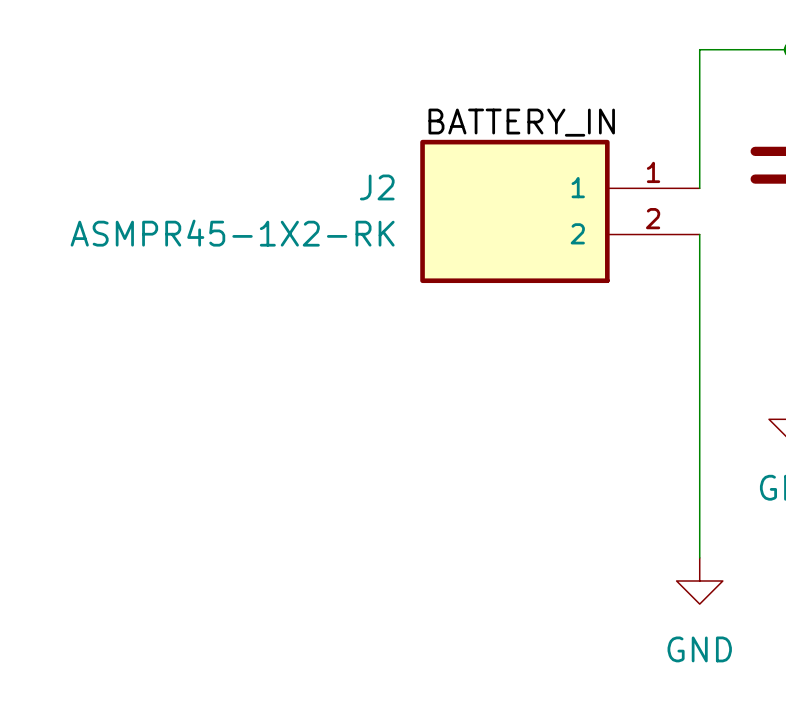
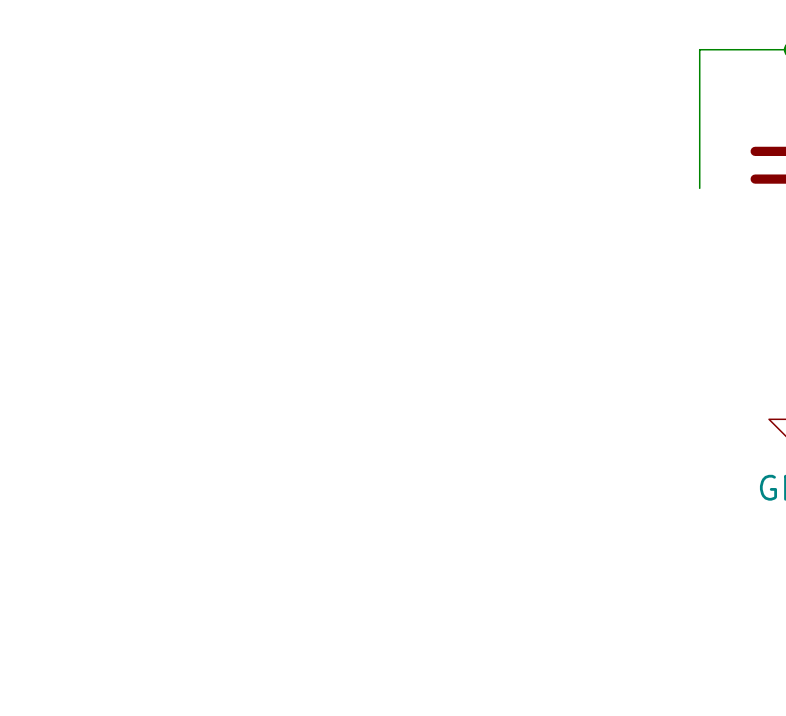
label: BATTERY_IN (521, 122) -> none
J2: ASMPR45-1X2-RK (559, 211) -> none
wire: (699, 234) (699, 557) -> none
power symbol: GND (699, 581) -> none

